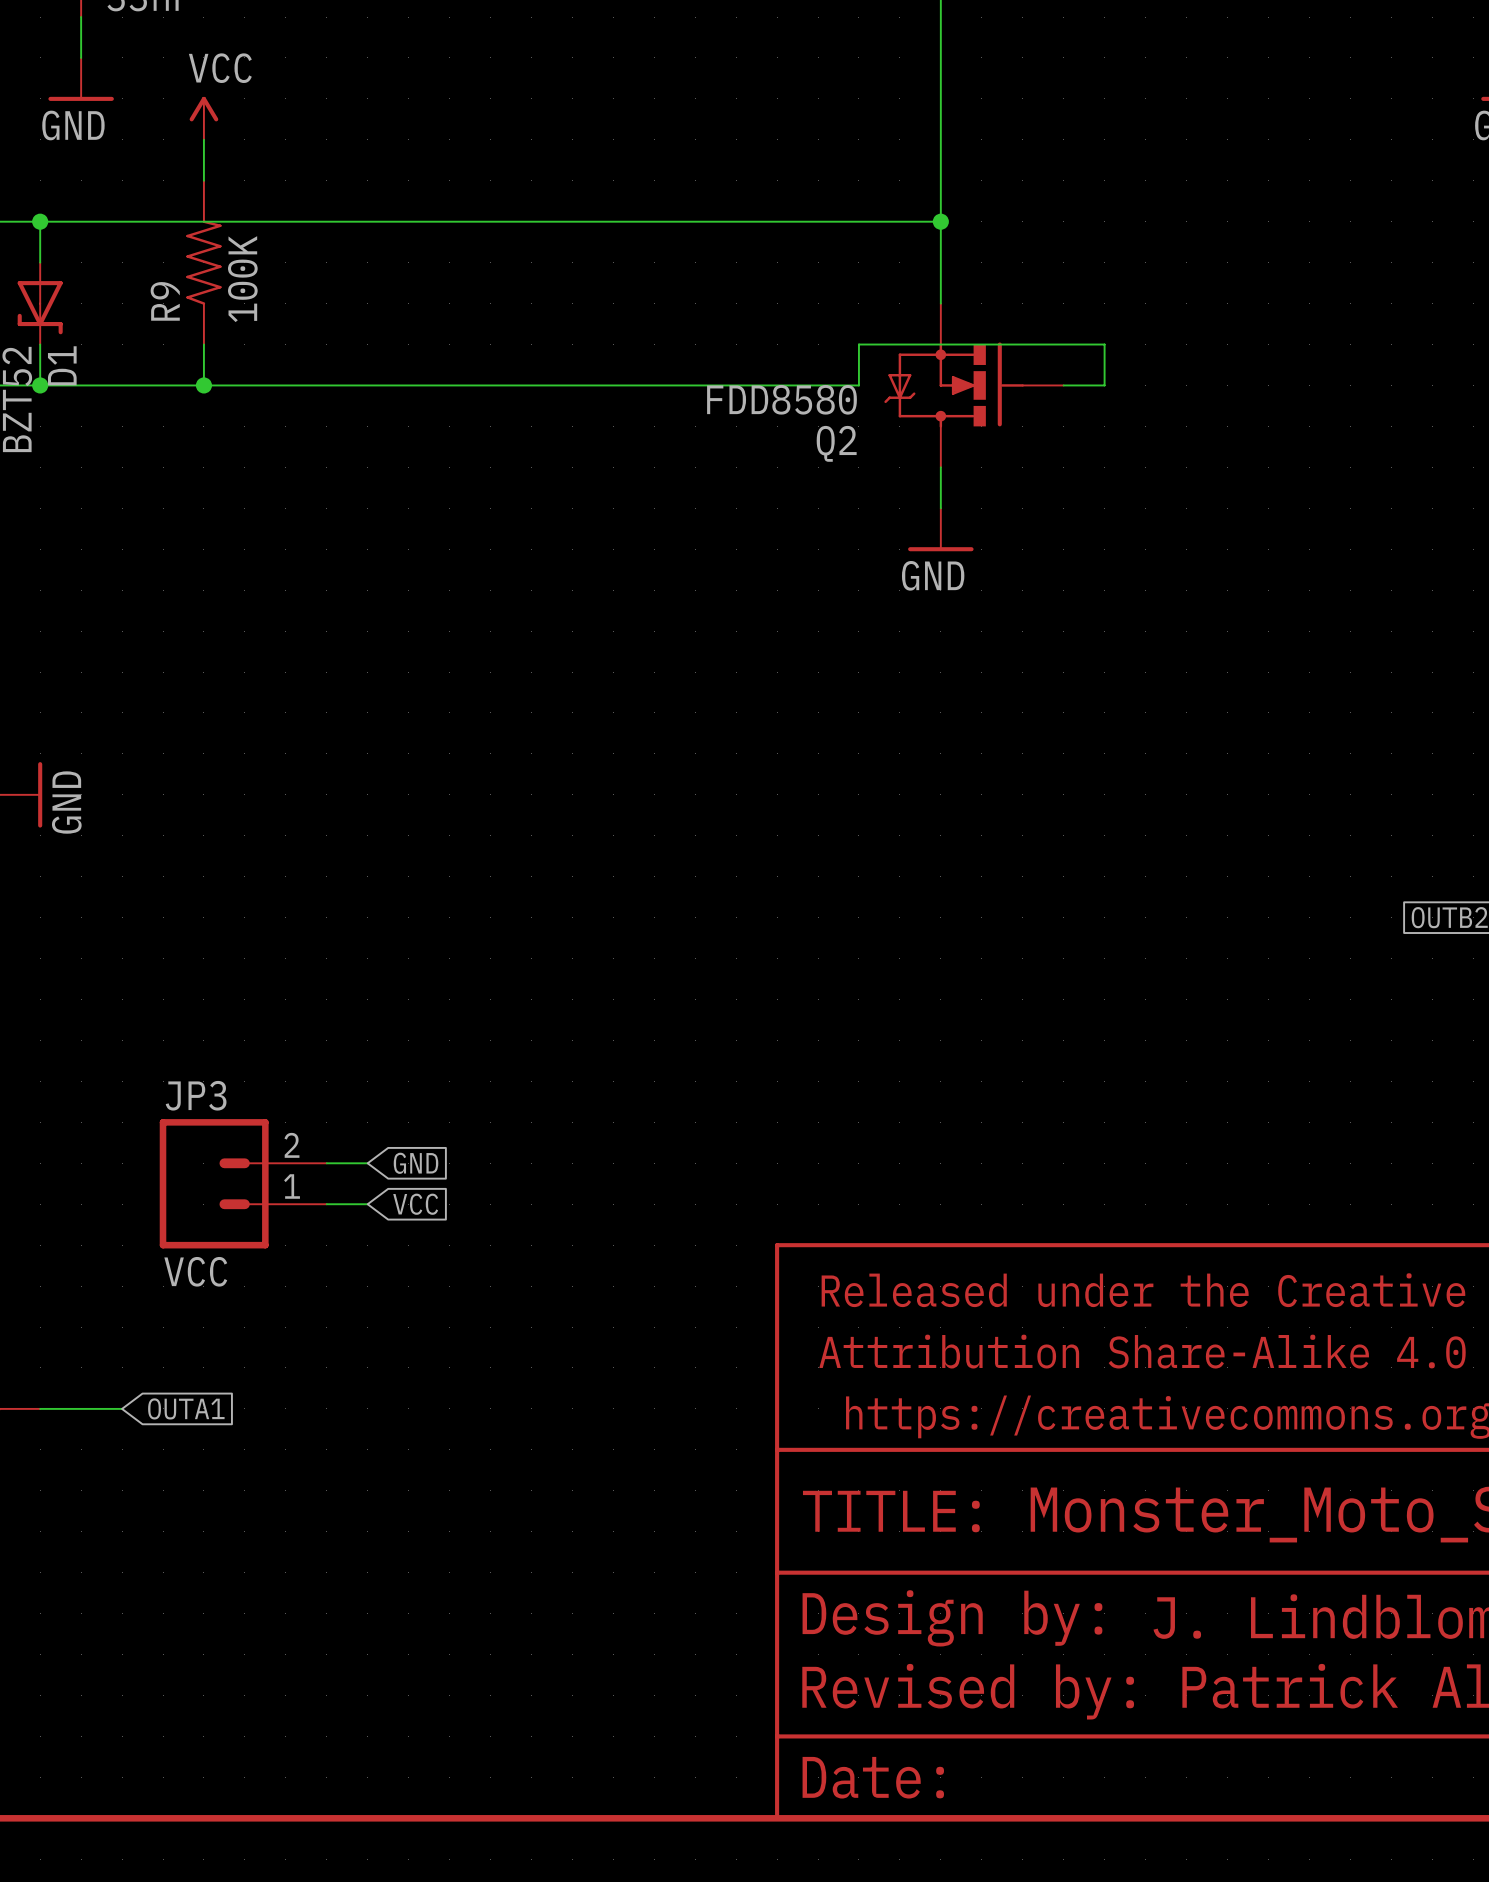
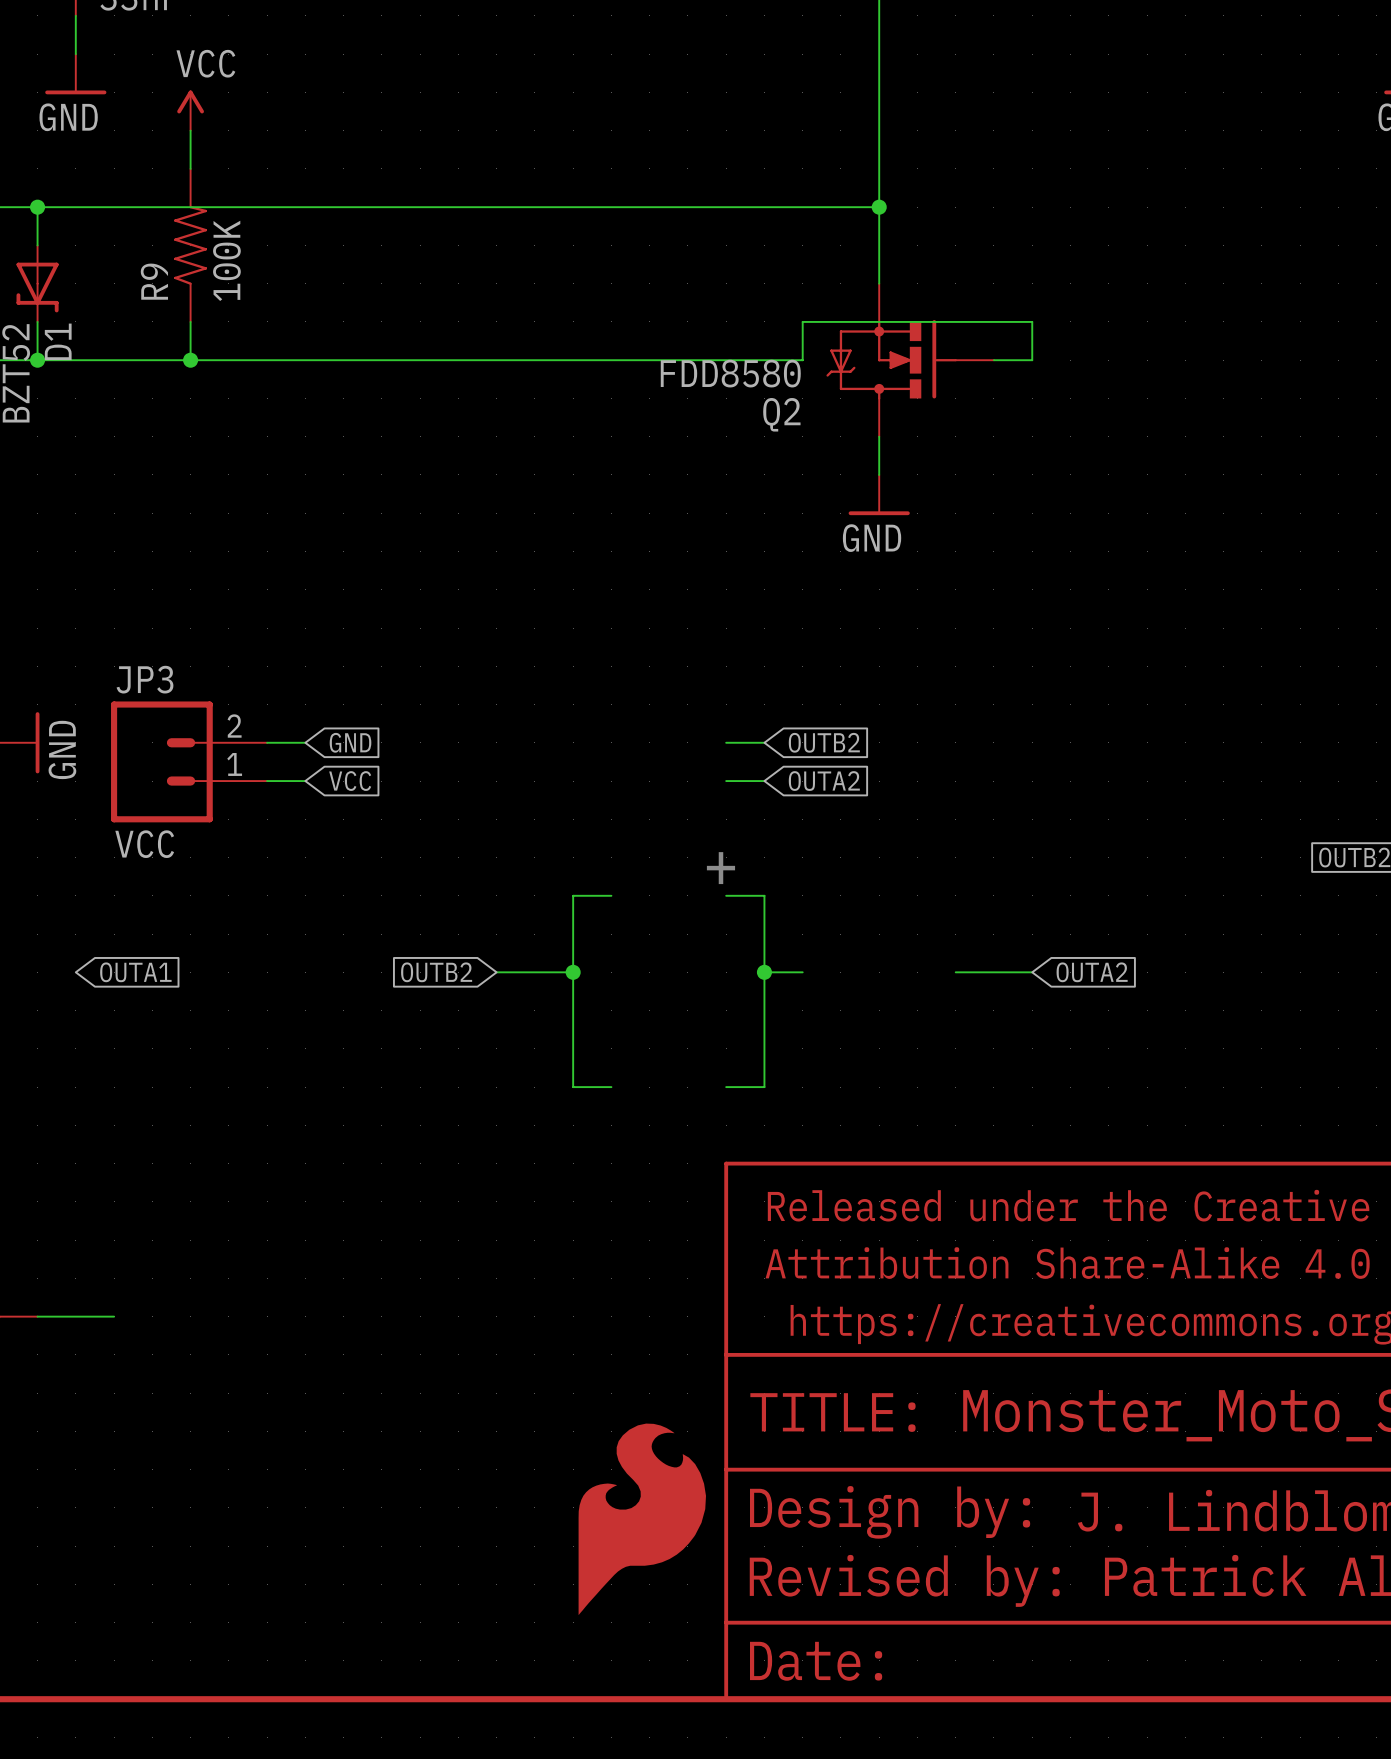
wire: none -> (726, 742) (764, 742)
global label: none -> OUTB2 (824, 742)
wire: none -> (726, 781) (764, 781)
global label: none -> OUTA2 (824, 781)
text: none -> + (720, 868)
wire: none -> (611, 895) (573, 895) (573, 1087) (611, 1087)
wire: none -> (726, 895) (764, 895) (764, 1087) (726, 1087)
global label: none -> OUTA1 (135, 972)
global label: none -> OUTB2 (436, 972)
wire: none -> (496, 972) (573, 972)
junction: none -> (573, 972)
wire: none -> (764, 972) (802, 972)
junction: none -> (764, 972)
wire: none -> (955, 972) (1032, 972)
global label: none -> OUTA2 (1092, 972)
wire: (326, 1163) (367, 1163) -> (267, 742) (305, 742)
global label position: GND (416, 1163) -> GND (350, 742)
JP3 position: (243, 1183) -> (189, 761)
wire: (326, 1204) (367, 1204) -> (267, 781) (305, 781)
global label position: VCC (415, 1204) -> VCC (350, 781)
global label: OUTA1 (186, 1408) -> none
part: none -> (642, 1519)

